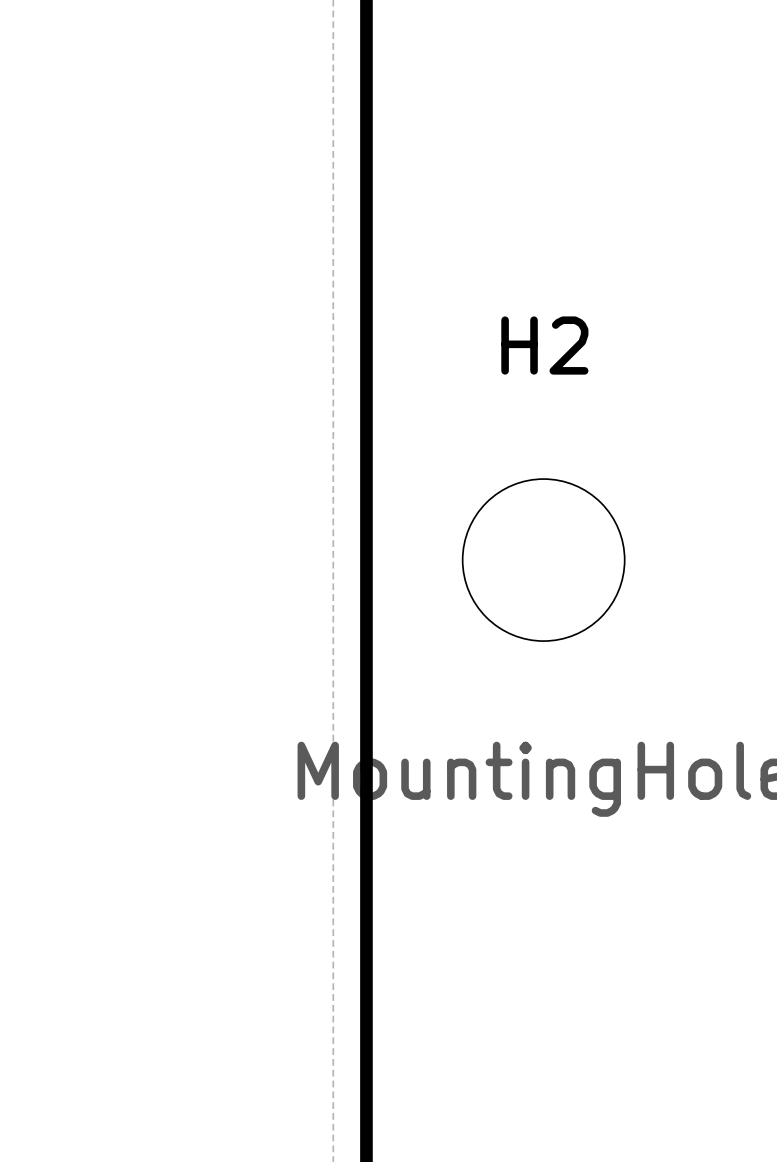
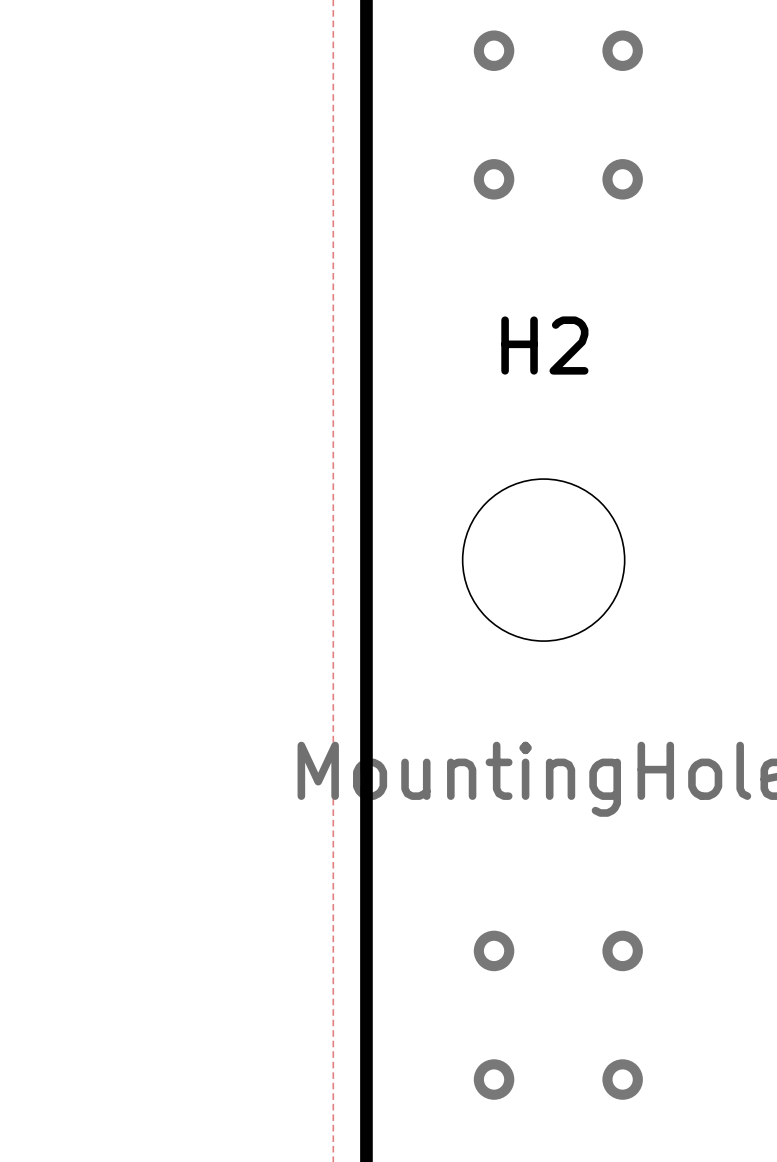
via: none -> (494, 50)
via: none -> (622, 50)
via: none -> (494, 179)
via: none -> (622, 179)
via: none -> (494, 950)
via: none -> (622, 950)
via: none -> (494, 1079)
via: none -> (622, 1079)

